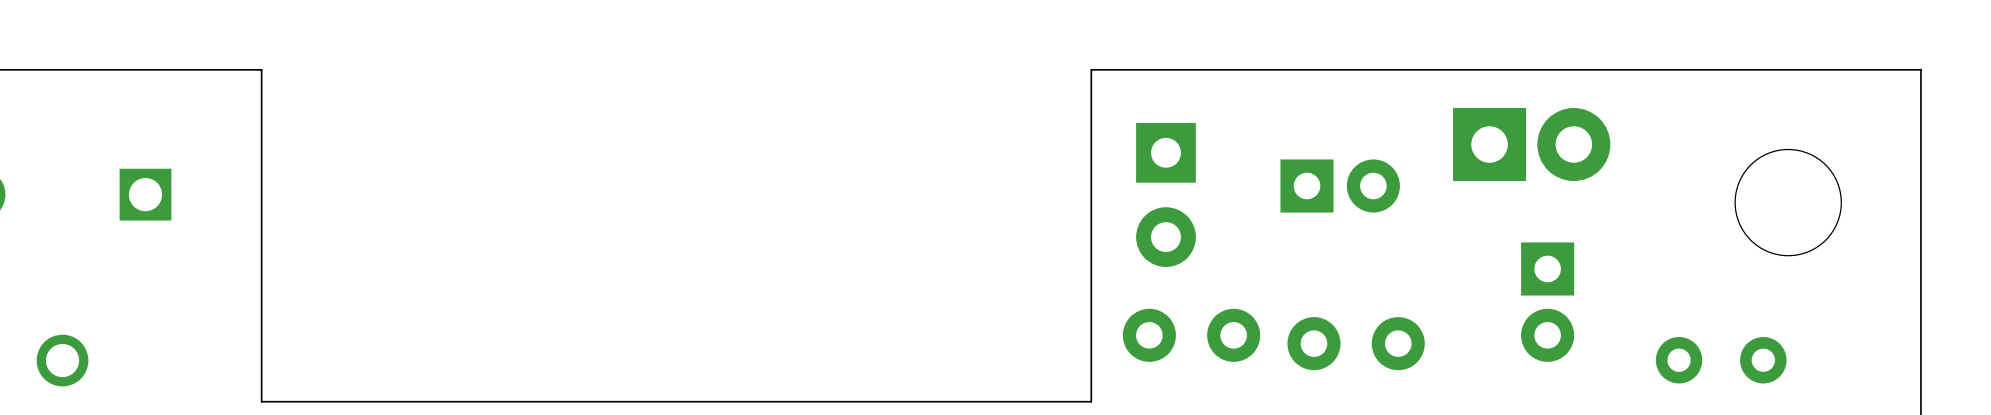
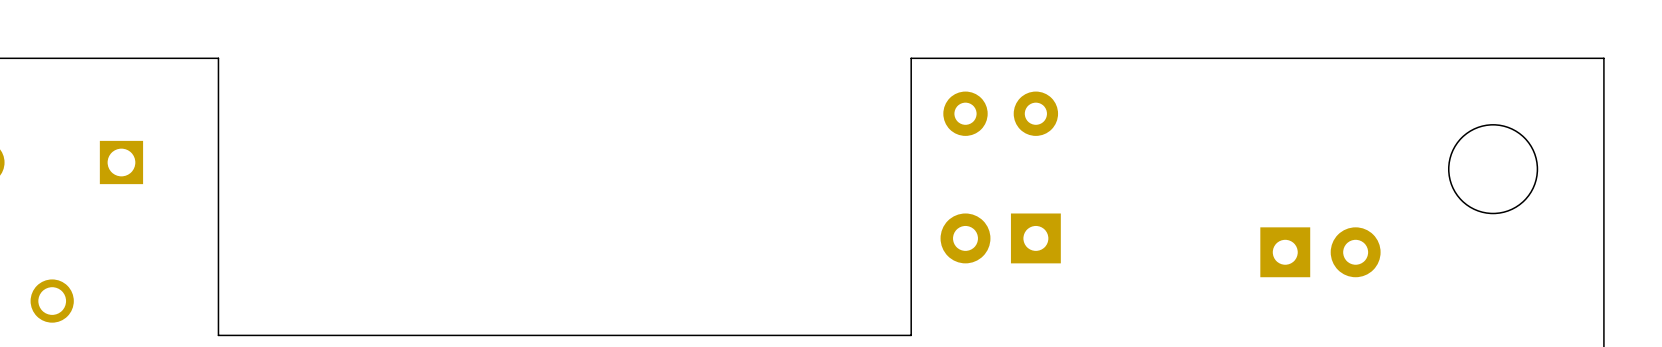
part: none -> (1000, 113)
part: (1531, 144) -> none
part: (1340, 186) -> none
part rotation: 0° (1165, 194) -> 90° clockwise (1000, 238)
part position: (1165, 194) -> (1000, 238)
part: (1547, 302) -> none
part: none -> (1320, 252)
part: (1191, 335) -> none
part: (1356, 343) -> none
part: (1721, 360) -> none

